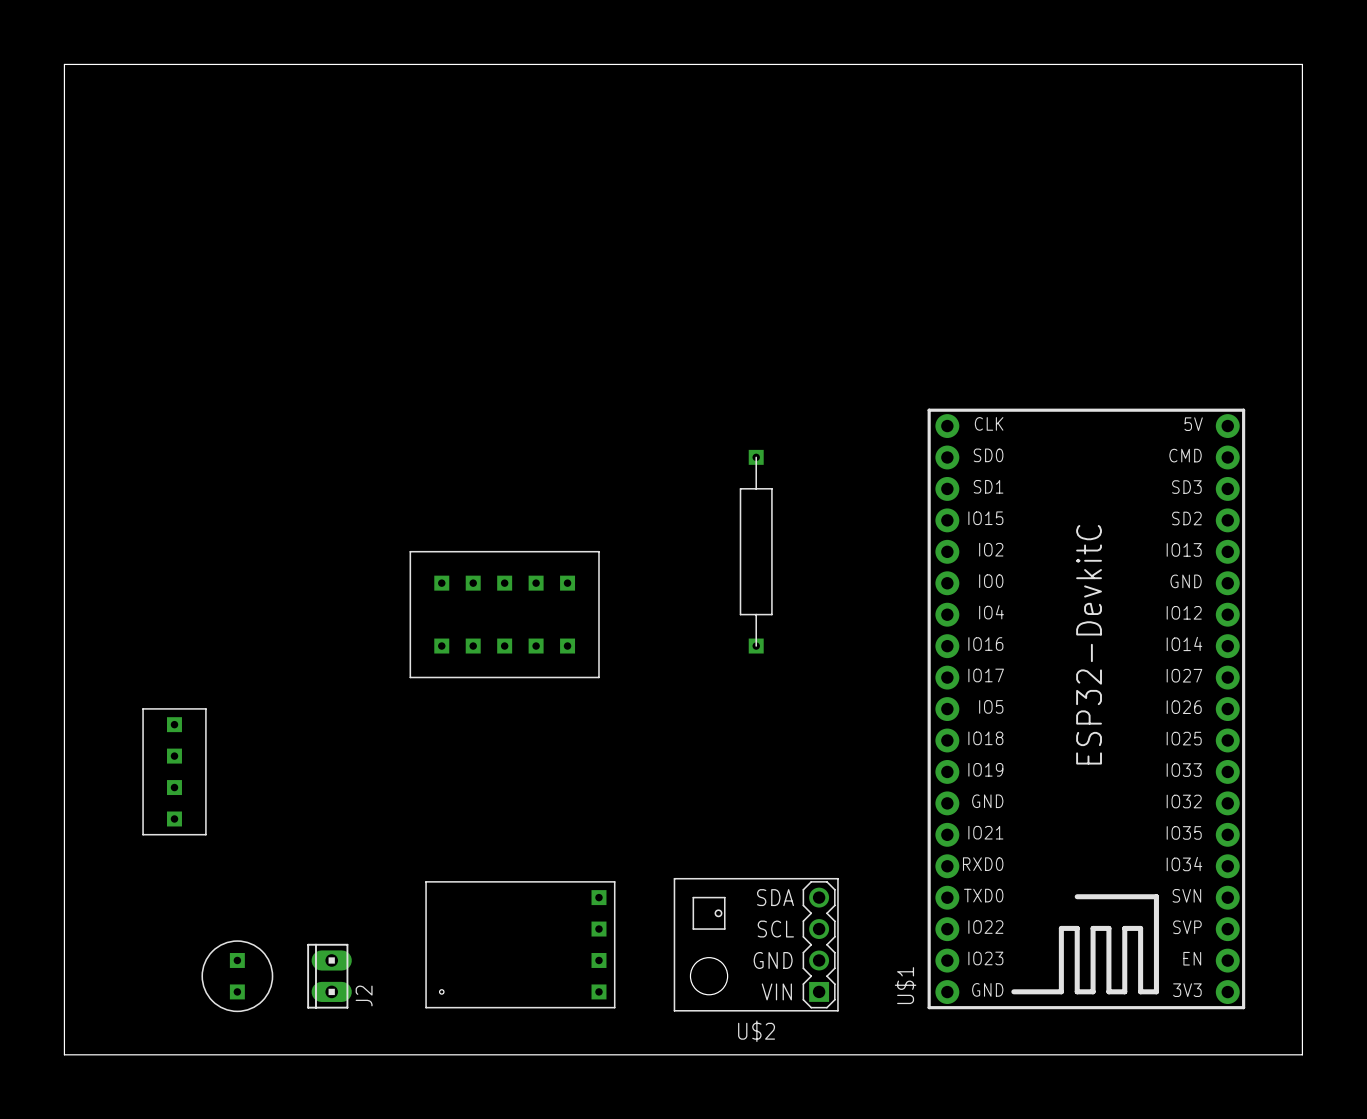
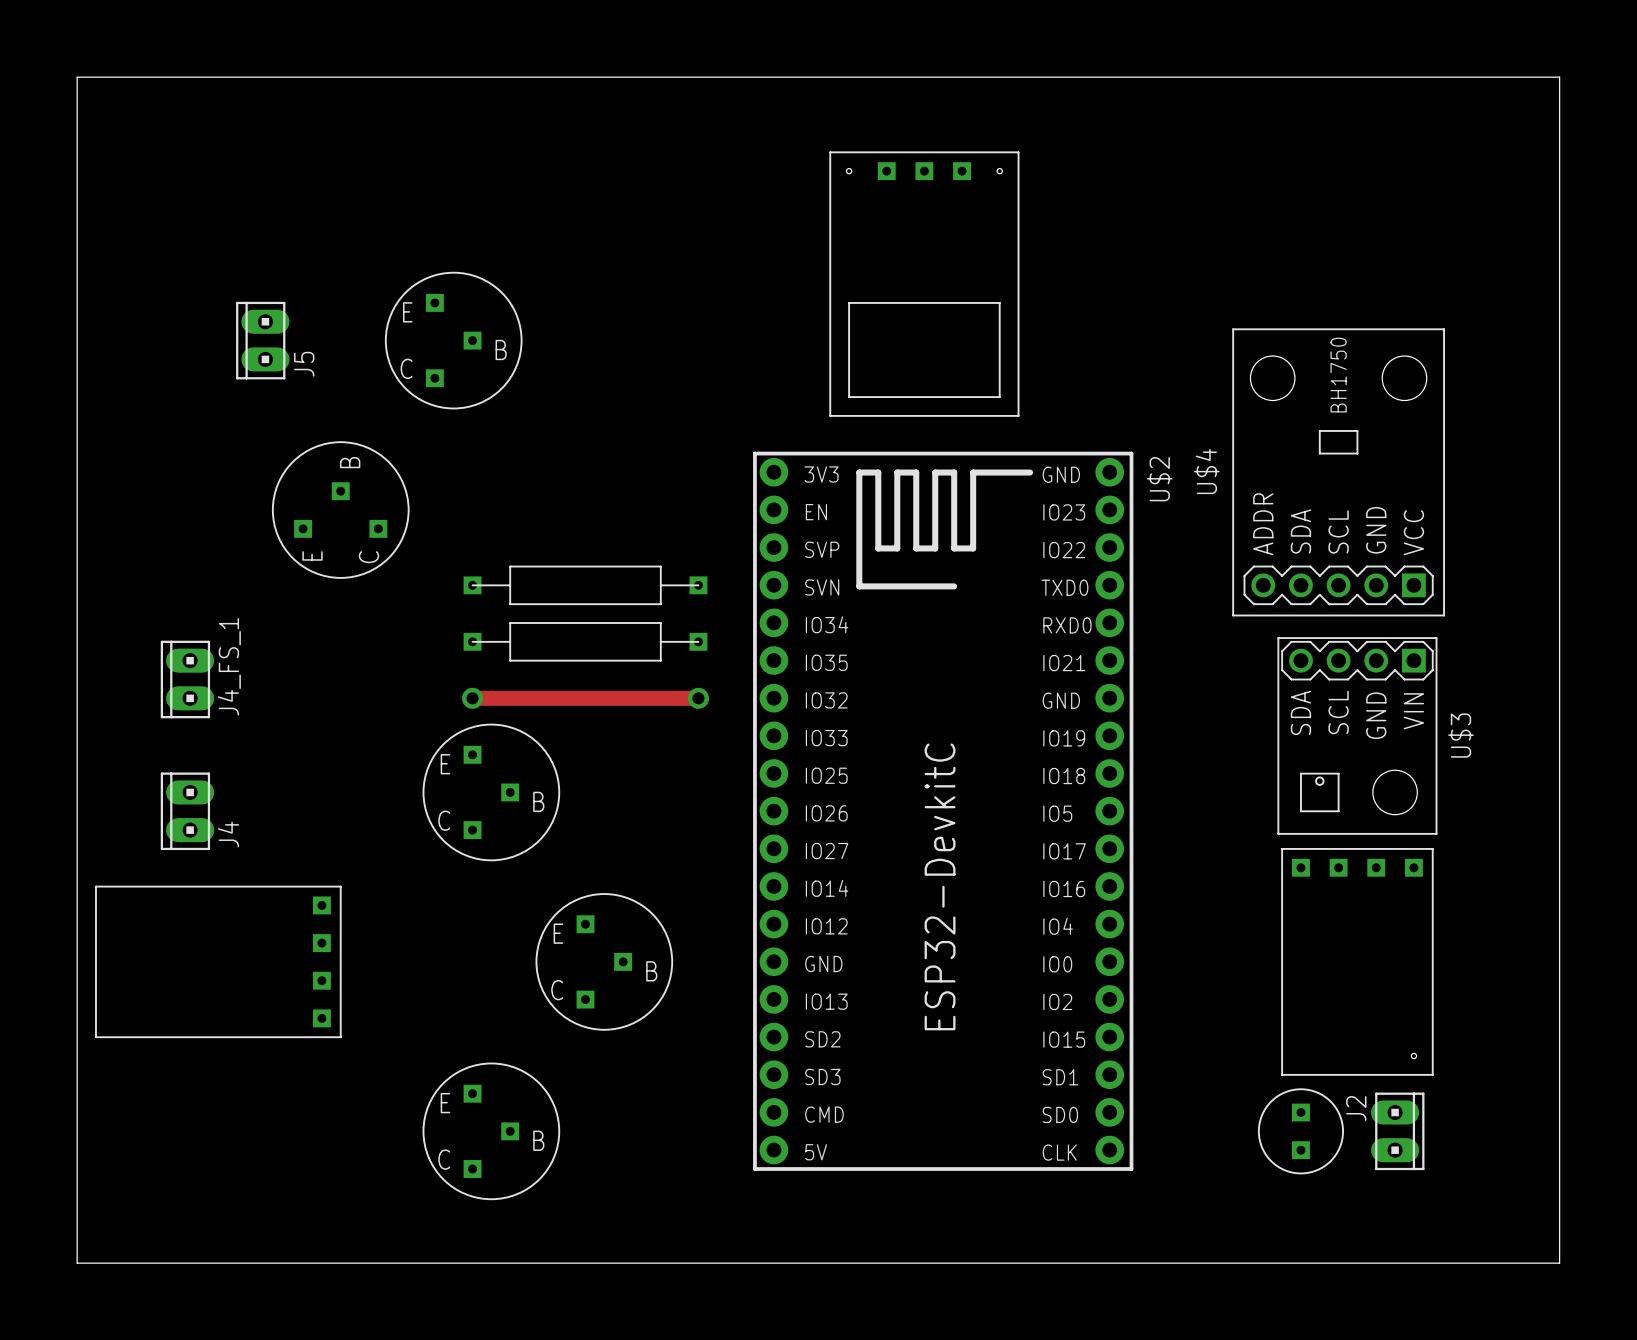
part: none -> (924, 284)
J5: none -> (262, 340)
part: none -> (453, 340)
U$4: none -> (1338, 472)
part: none -> (340, 510)
part: none -> (585, 585)
part: none -> (585, 641)
part: (756, 551) -> none
J4_FS_1: none -> (187, 679)
track: none -> (472, 698) (698, 698)
via: none -> (472, 698)
via: none -> (698, 698)
part: (504, 614) -> none
U$3: none -> (1357, 735)
part: none -> (491, 792)
J4: none -> (187, 811)
U$1: (1086, 708) -> none
part: (174, 771) -> none
part: none -> (218, 961)
part: none -> (604, 961)
part: none -> (1357, 961)
U$2 footprint: [673, 877, 839, 1012] -> [753, 451, 1134, 1171]
part: none -> (491, 1131)
part: (520, 944) -> none
part: none -> (1300, 1131)
part: (237, 976) -> none
J2 rotation: 0° (329, 976) -> 180° (1397, 1131)
J2 position: (329, 976) -> (1397, 1131)
U$2 name position: U$2 (756, 1031) -> U$2 (1159, 479)

